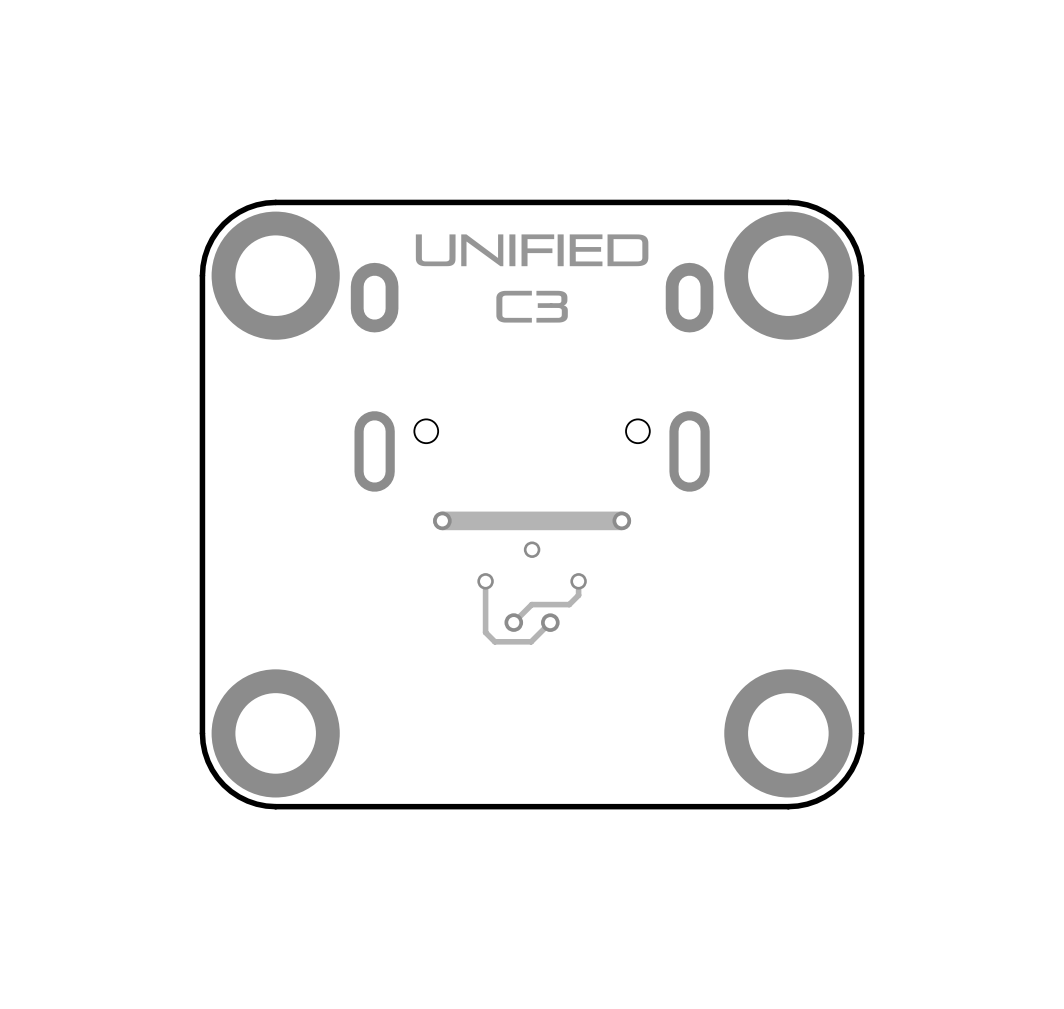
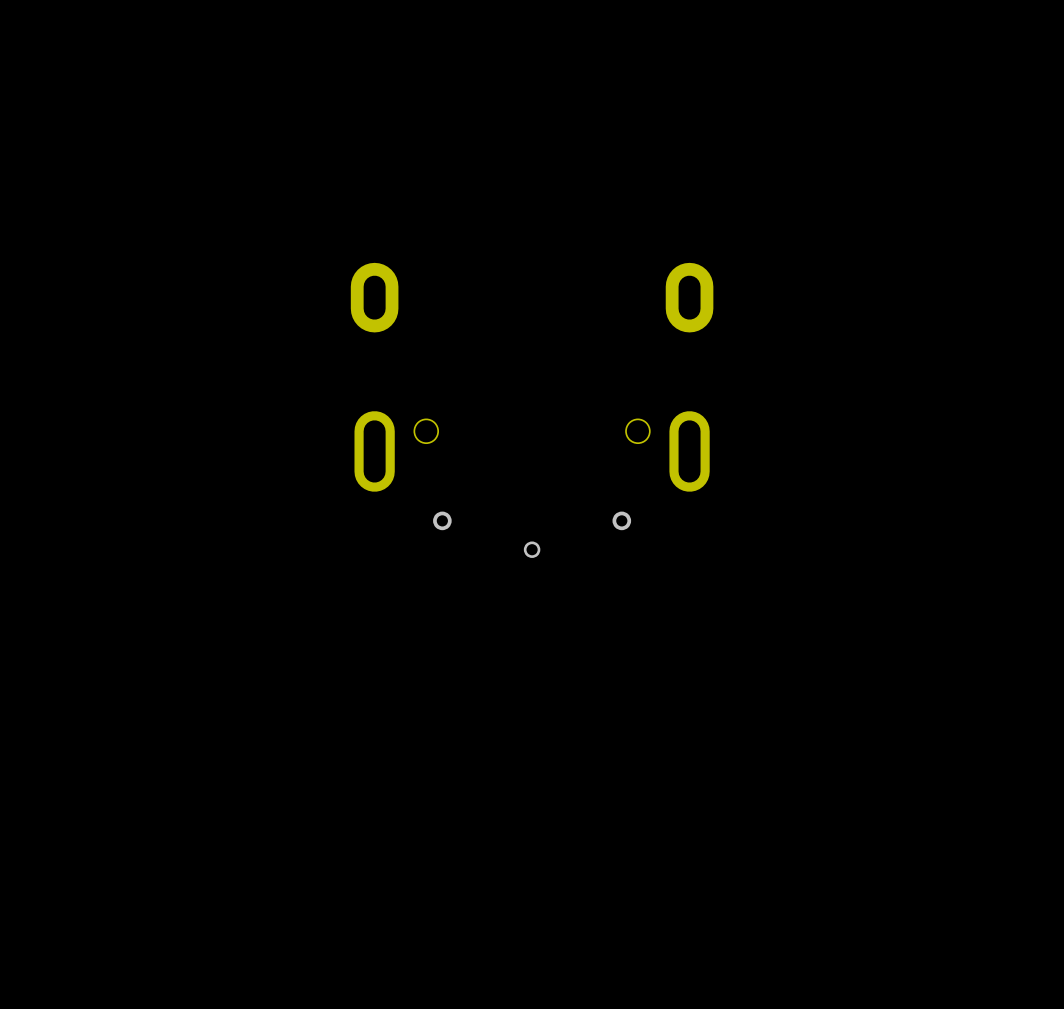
board edge: (788, 202) (275, 202) (247, 208) (223, 223) (208, 247) (202, 275) (202, 733) (208, 761) (223, 785) (247, 801) (275, 806) (788, 806) (816, 801) (840, 785) (856, 761) (861, 733) (860, 266) (851, 239) (832, 217) (807, 204) (788, 202) -> none
part: (275, 275) -> none
part: (788, 275) -> none
part: (532, 278) -> none
track: (621, 520) (442, 520) -> none
track: (485, 581) (485, 632) (494, 641) (531, 641) (550, 622) -> none
via: (485, 581) -> none
track: (578, 581) (578, 595) (569, 604) (531, 604) (513, 622) -> none
via: (578, 581) -> none
via: (513, 622) -> none
via: (550, 622) -> none
part: (275, 733) -> none
part: (788, 733) -> none

